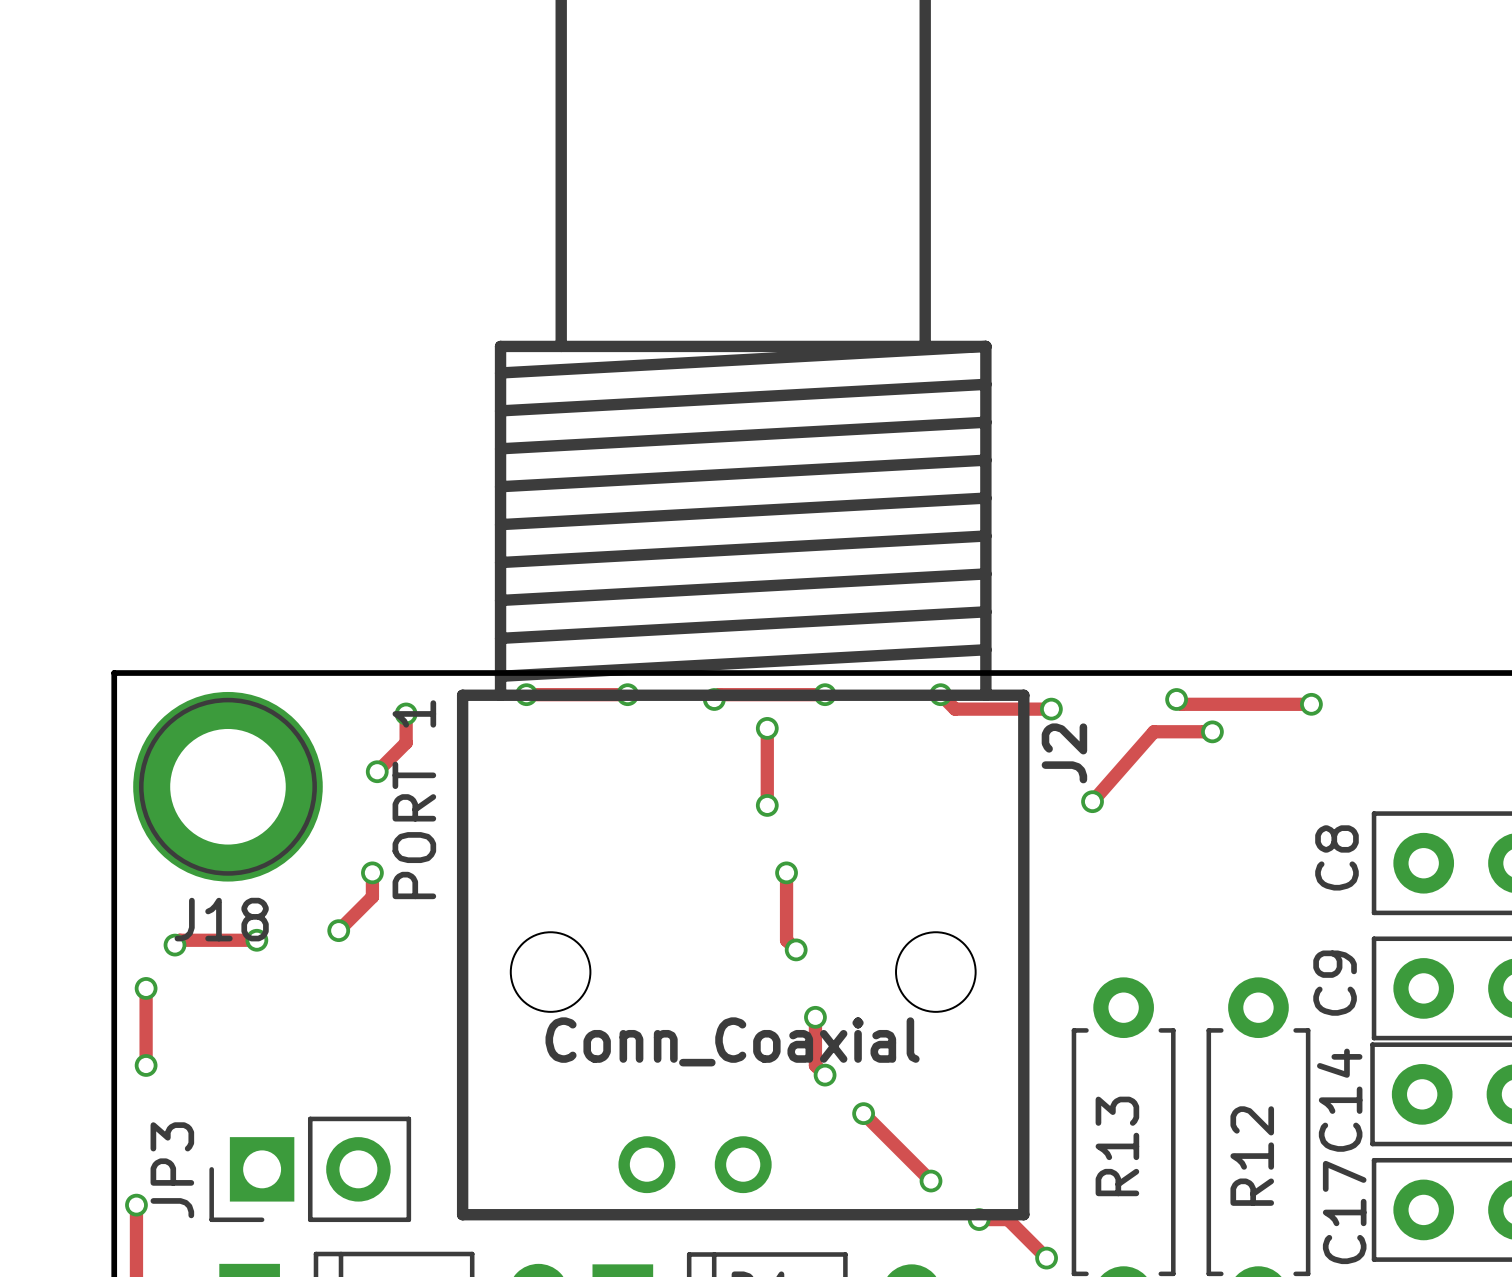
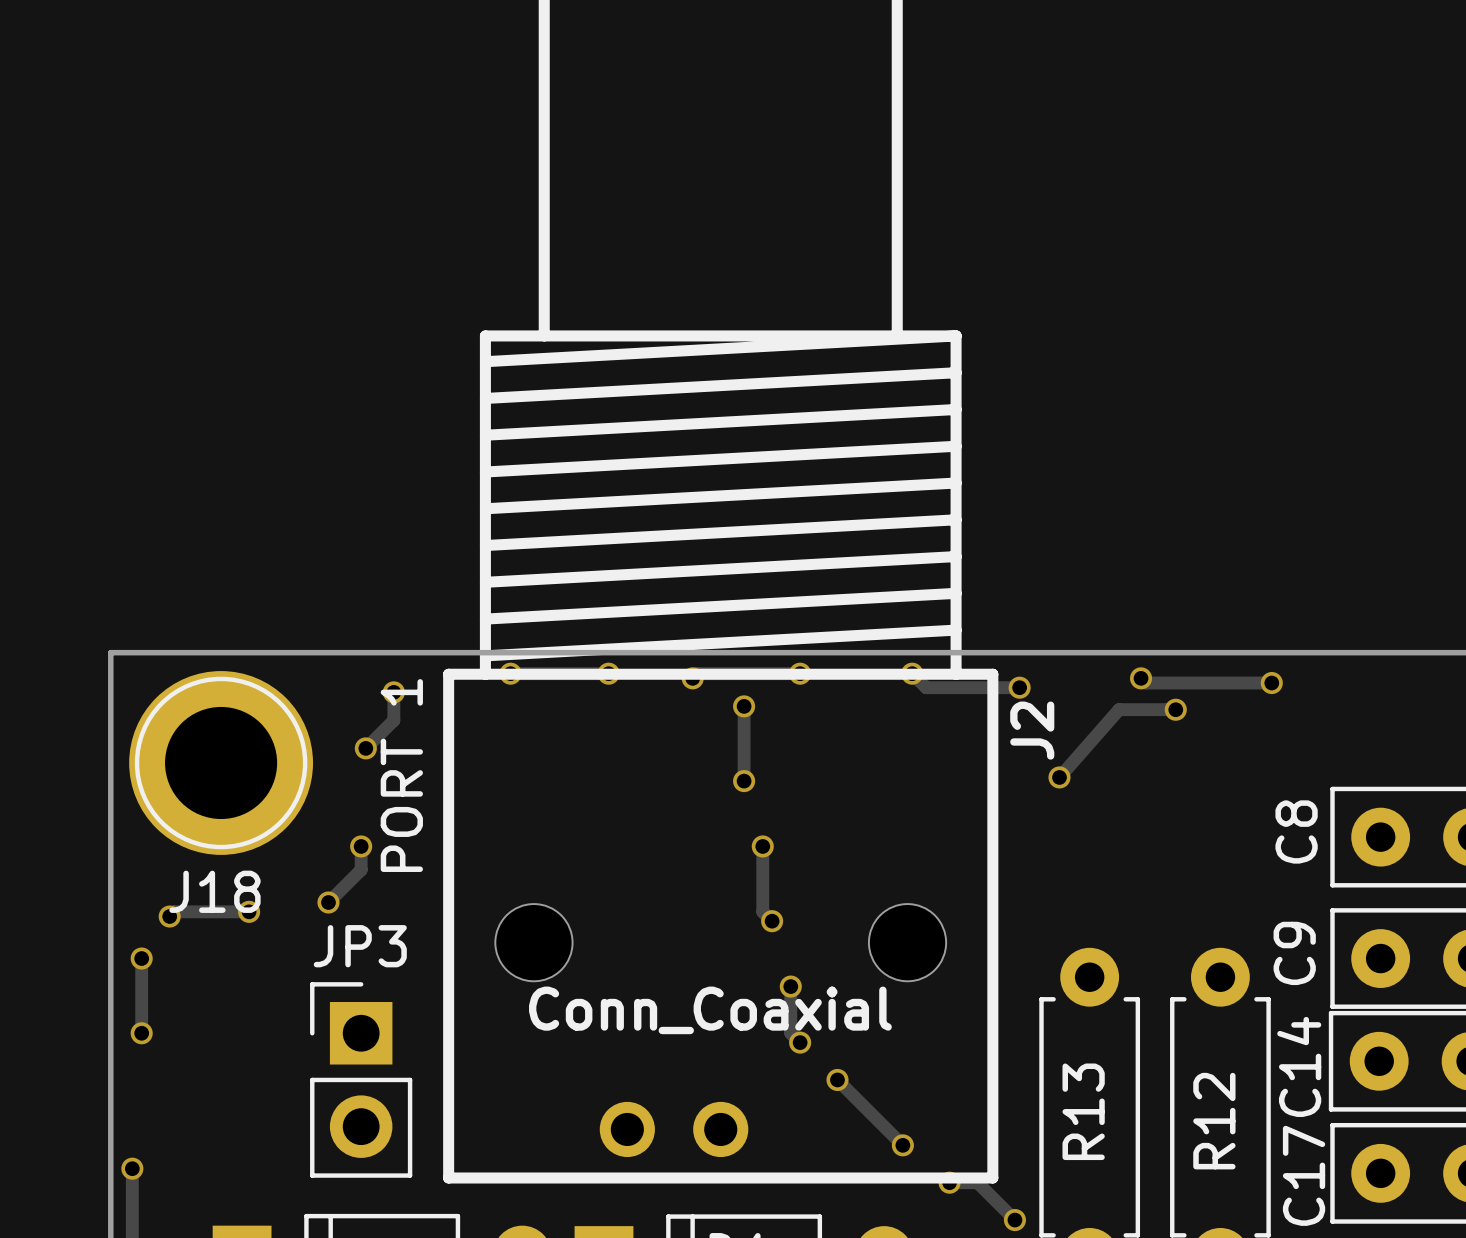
JP3 rotation: 0° (310, 1169) -> 90° clockwise (361, 1079)

